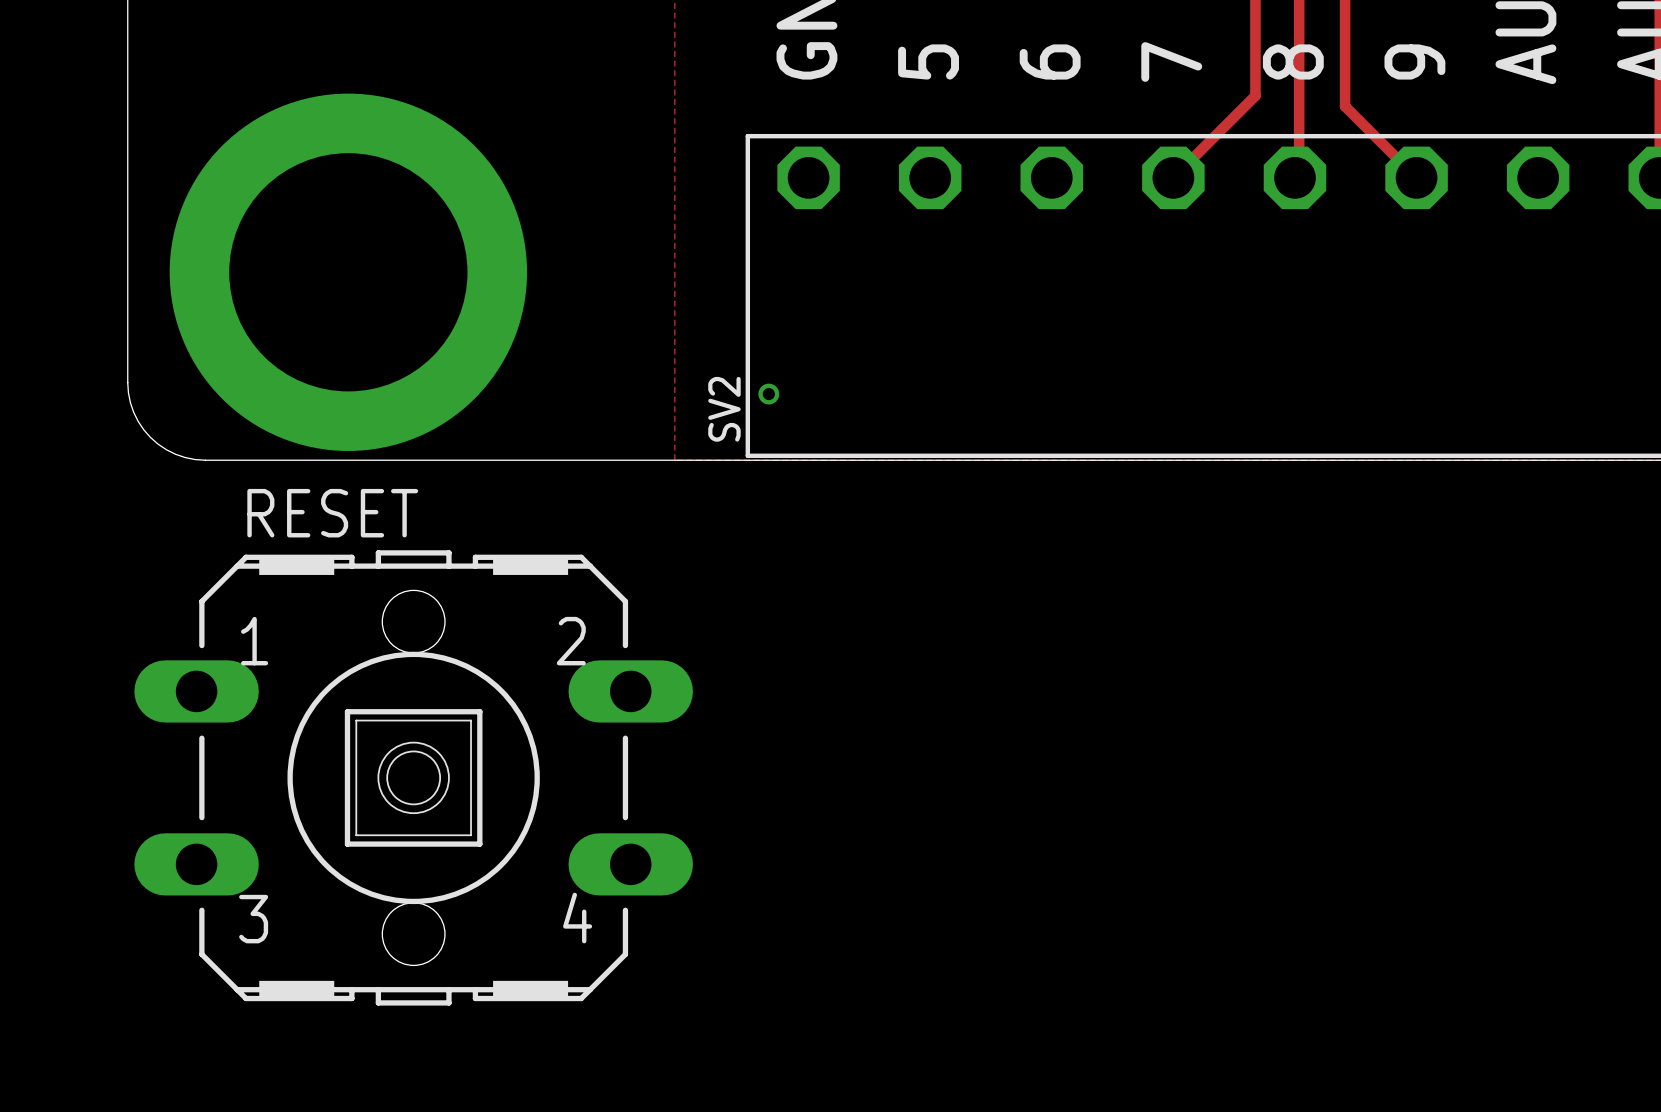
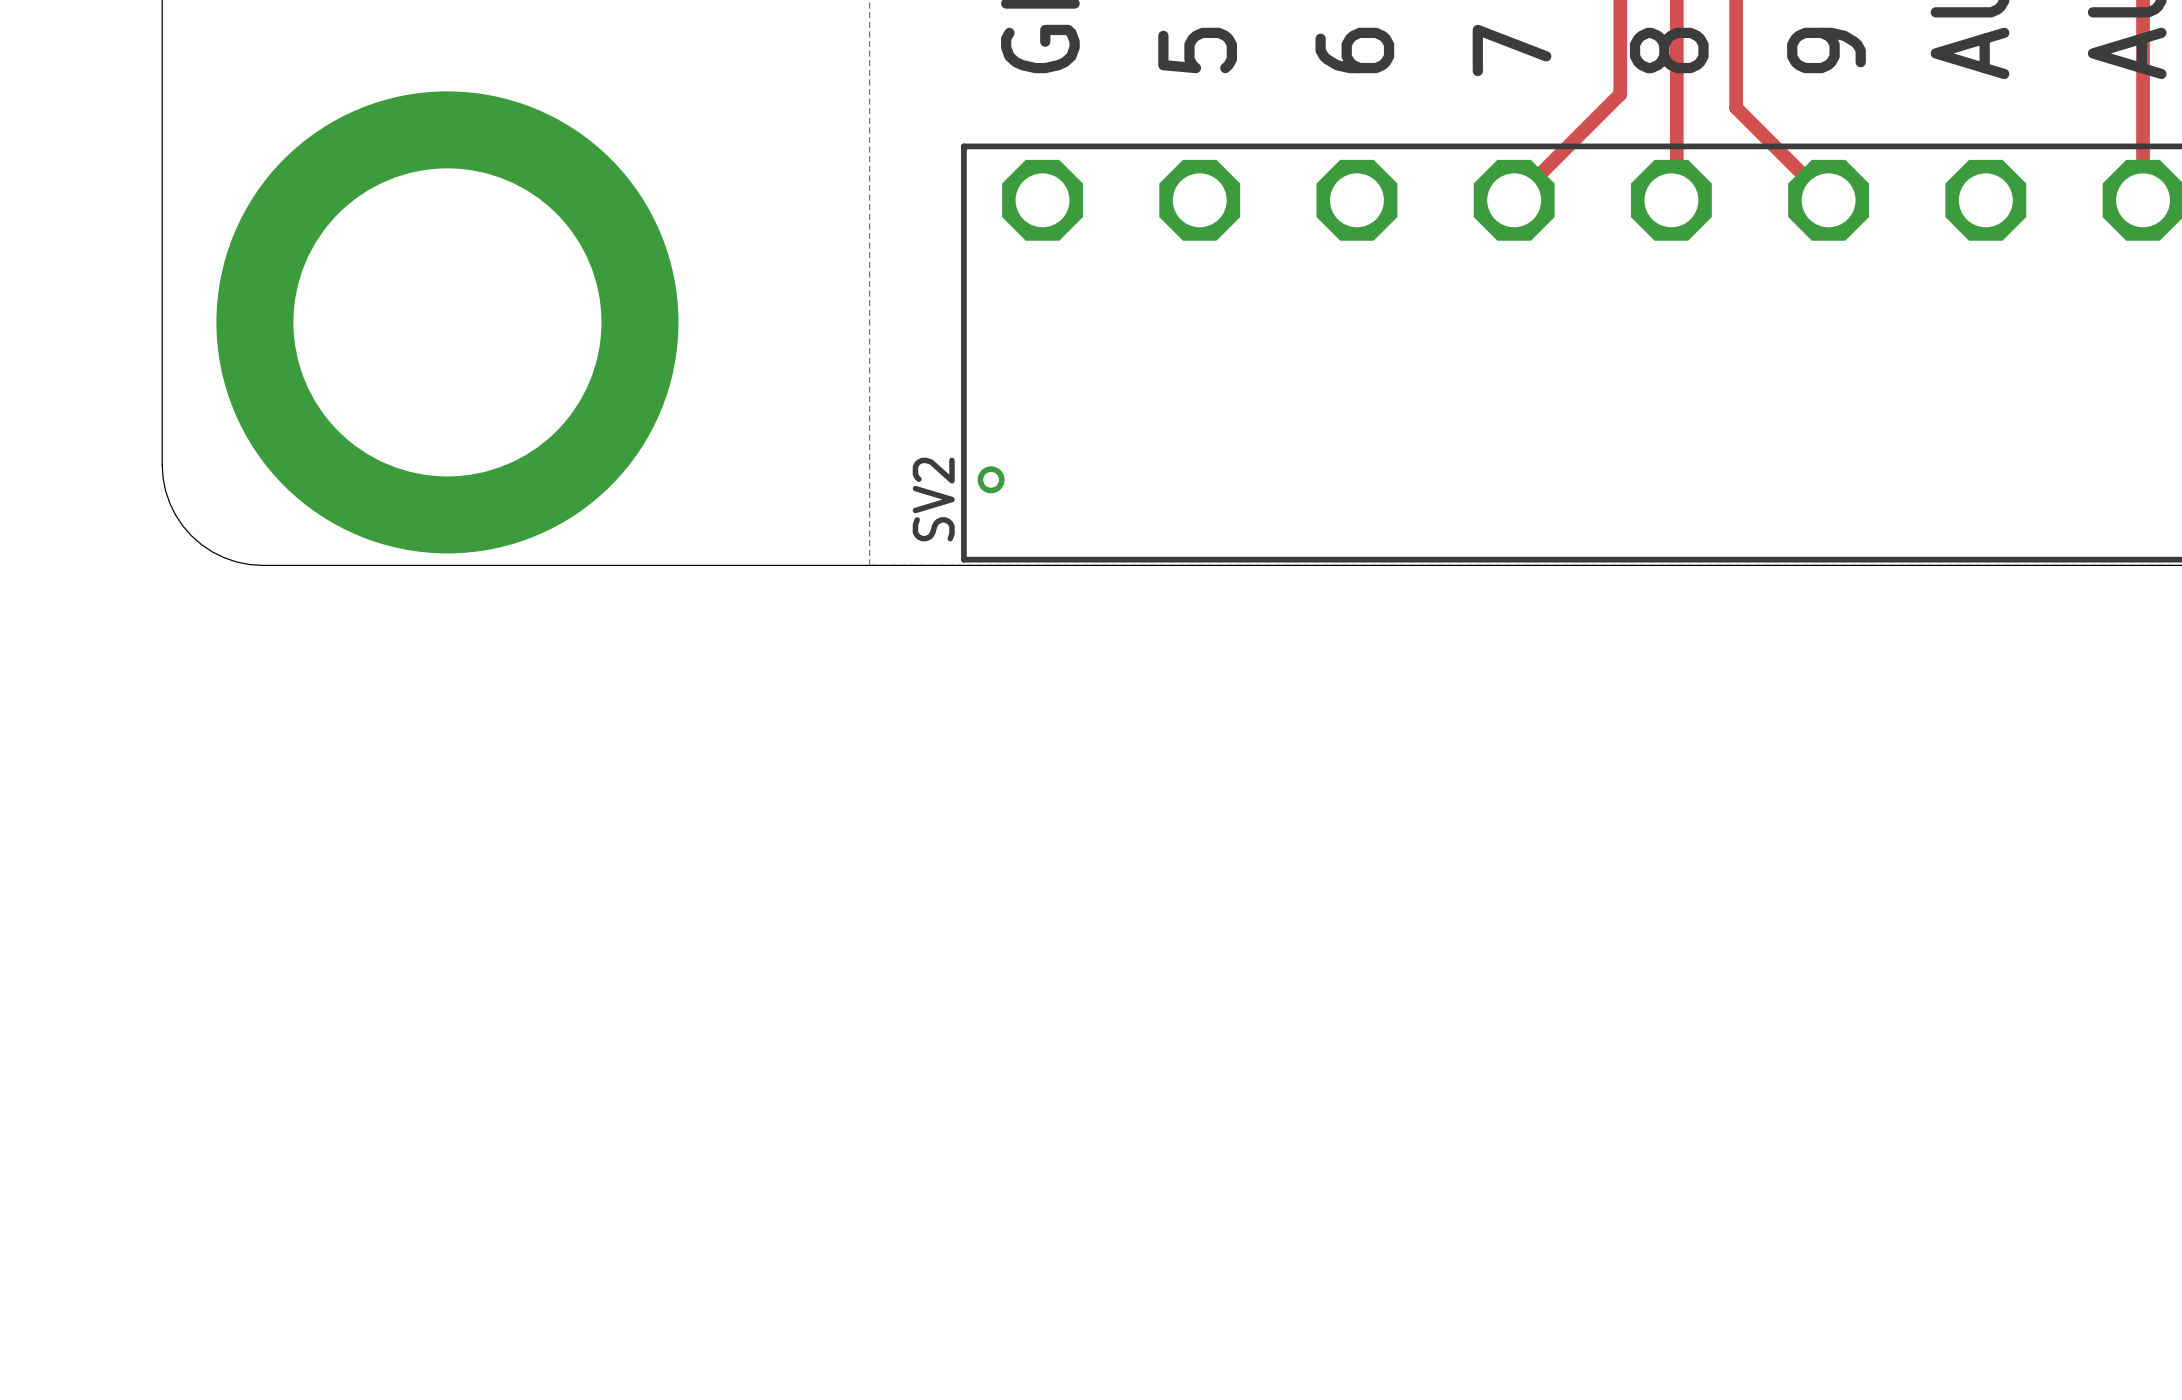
RESET: (413, 777) -> none

